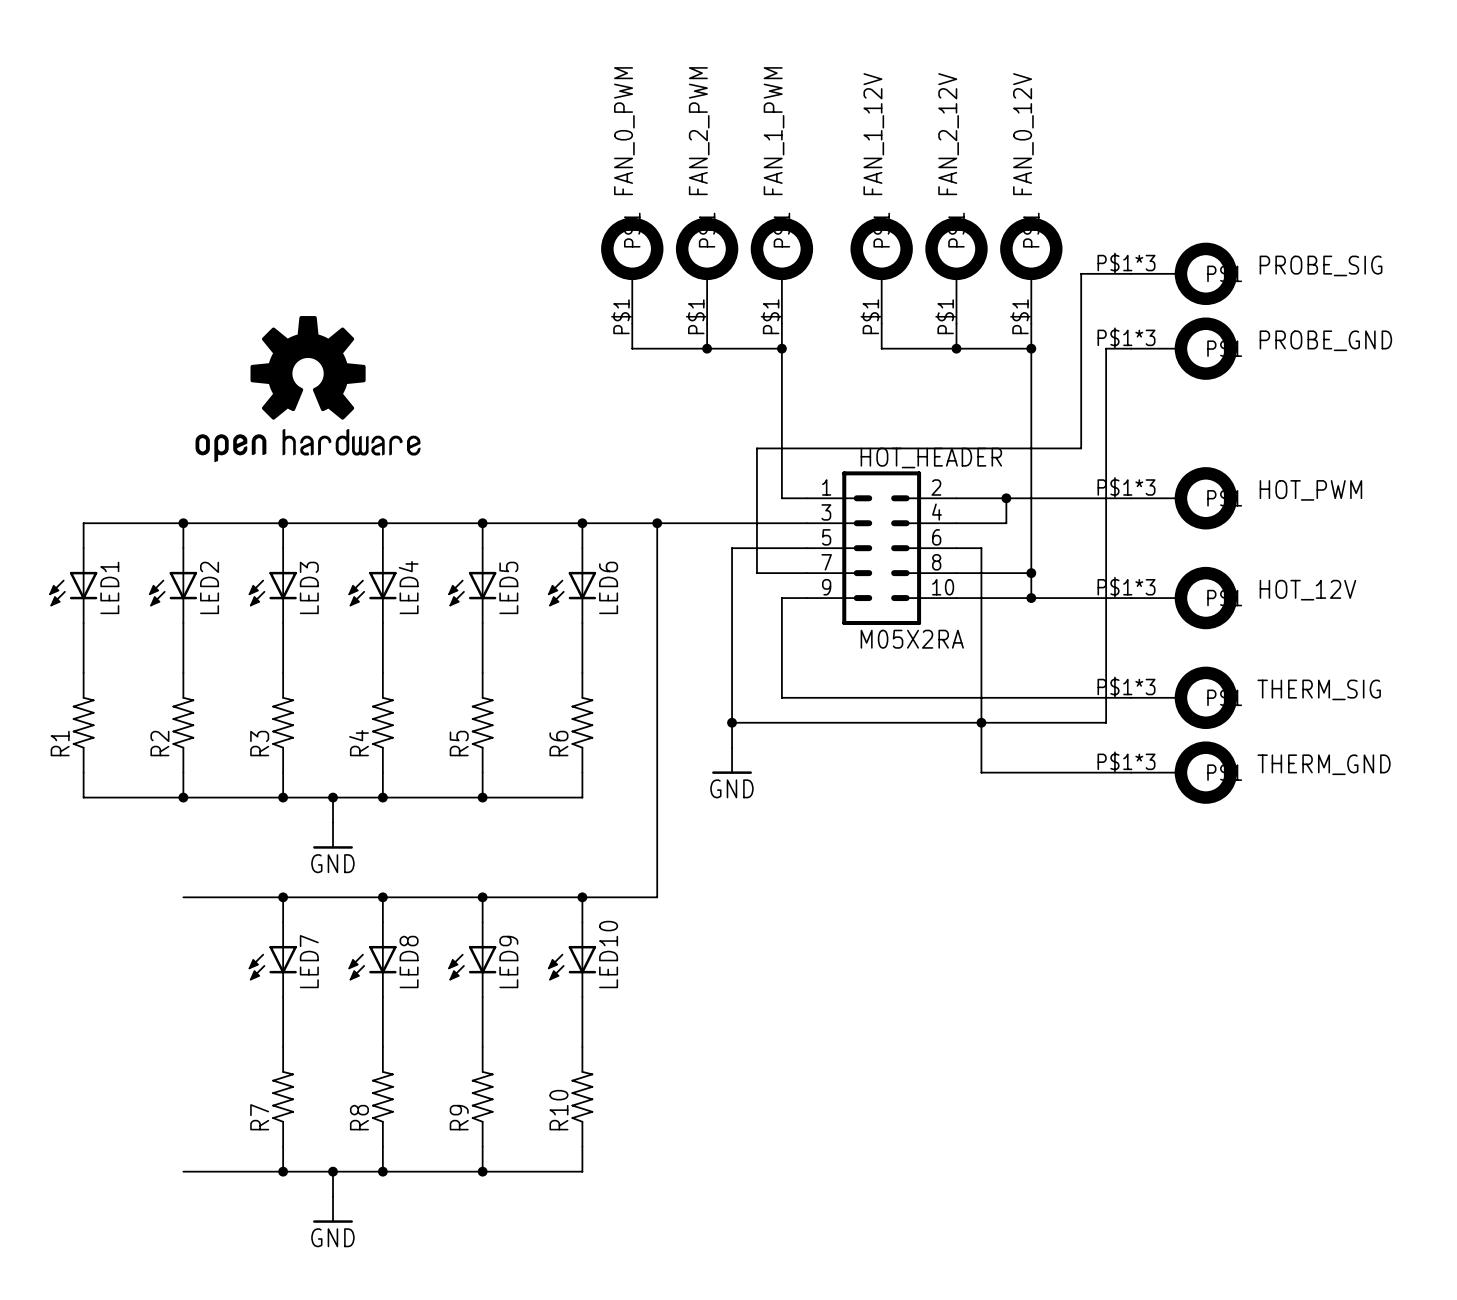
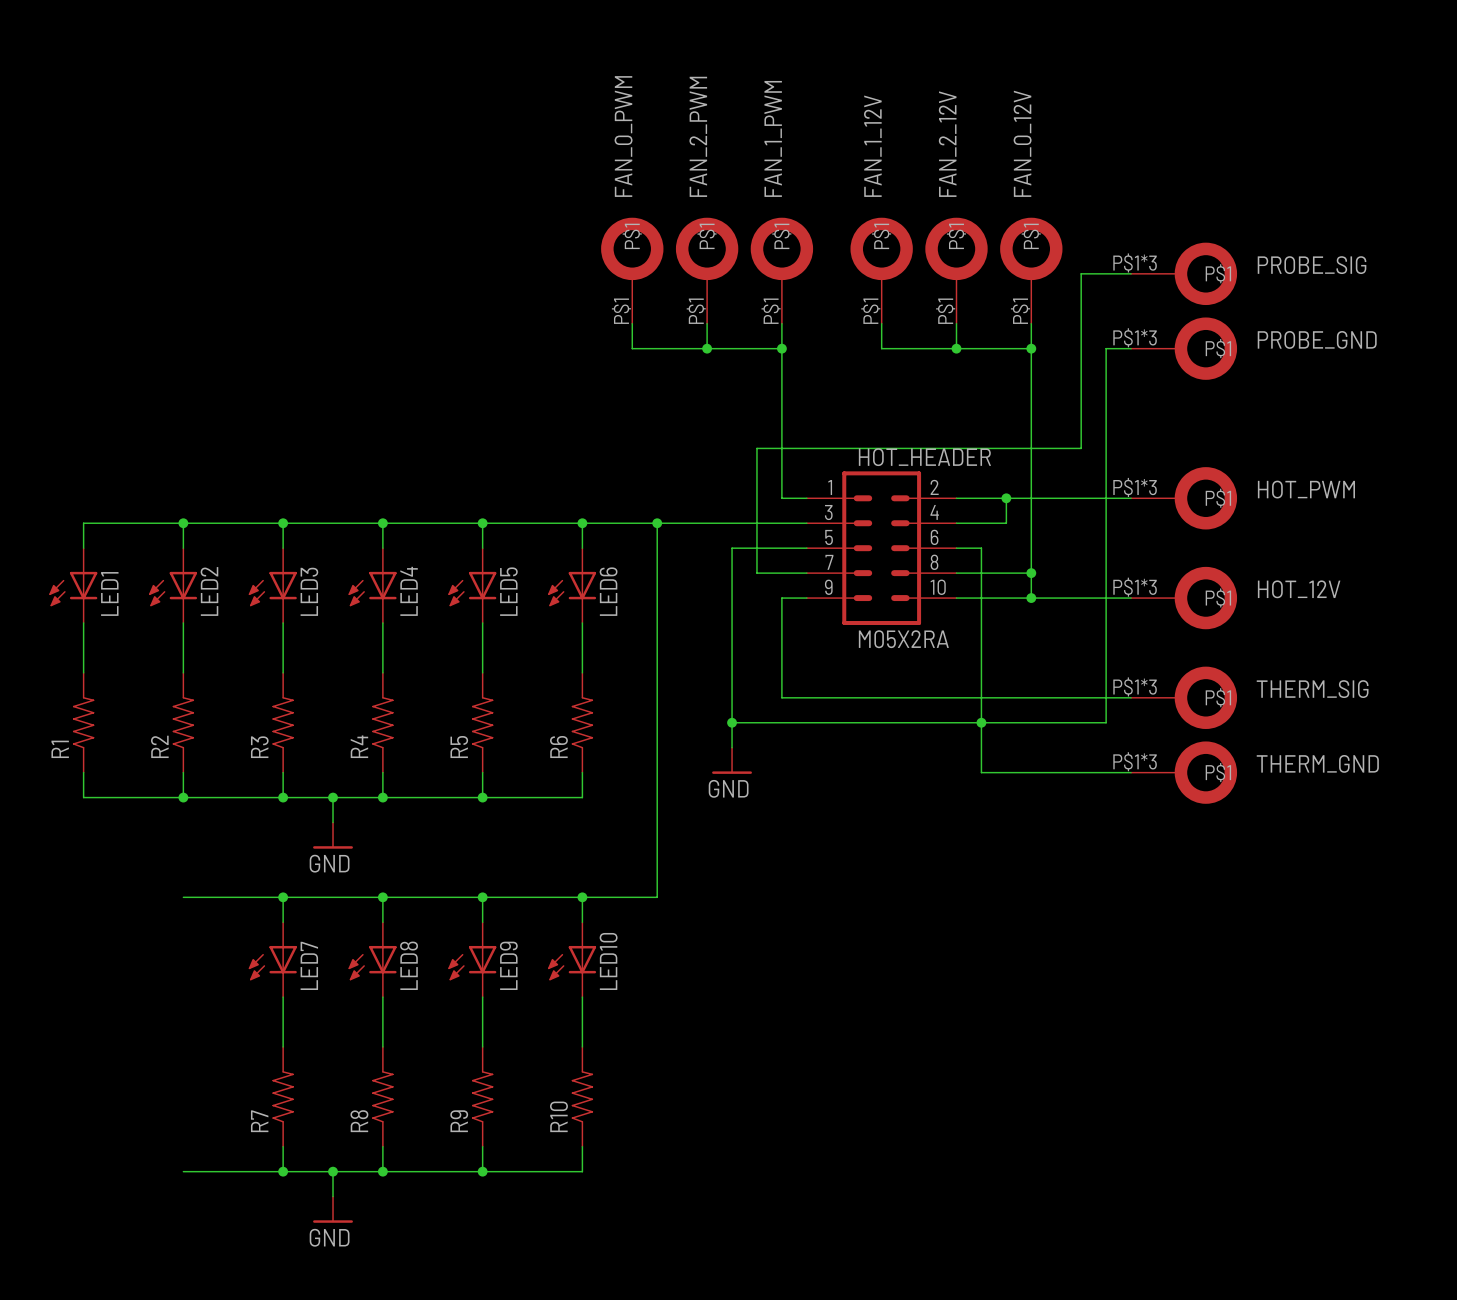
part: (308, 389) -> none

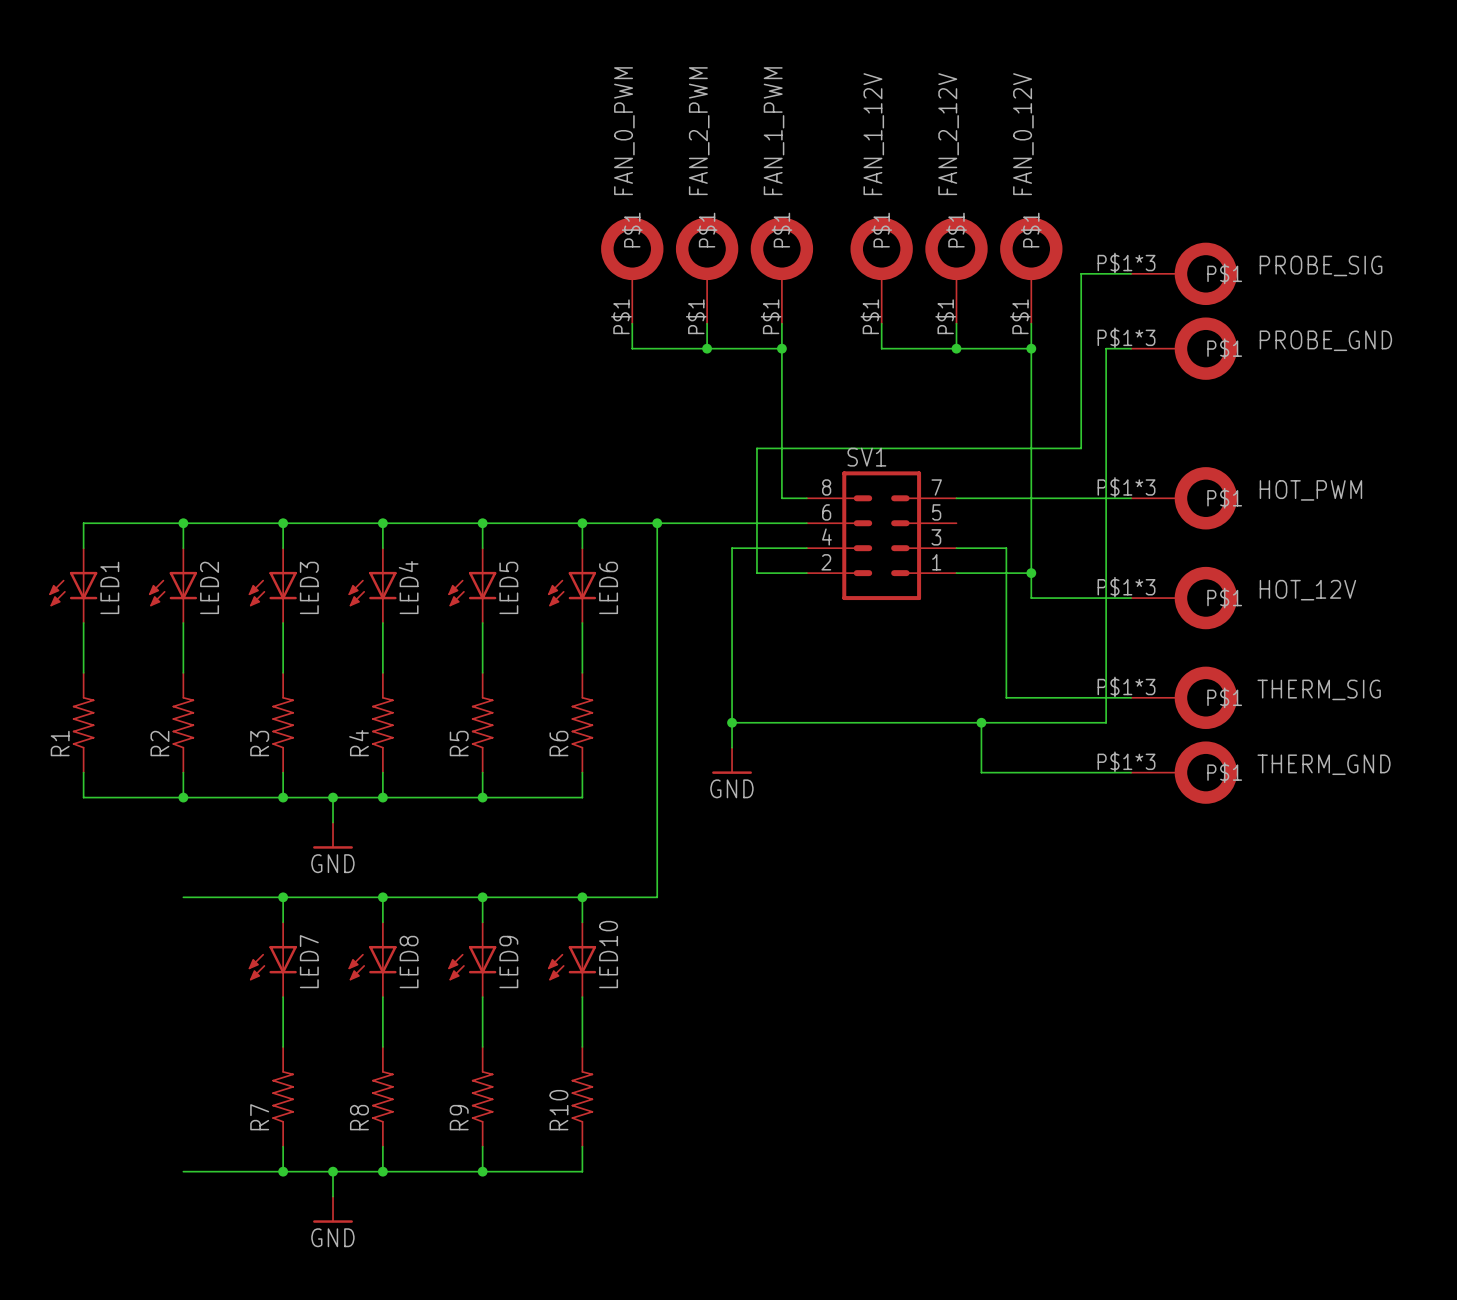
wire: (1006, 498) (1006, 523) (956, 523) -> none
junction: (1006, 498) -> none
SV1: none -> (881, 535)
HOT_HEADER: M05X2RA (881, 548) -> none
wire: (981, 548) (981, 722) -> (981, 548) (1006, 548) (1006, 697)
wire: (806, 598) (781, 598) (781, 697) (1006, 697) -> none
wire: (956, 598) (1031, 598) -> none
junction: (1031, 598) -> none

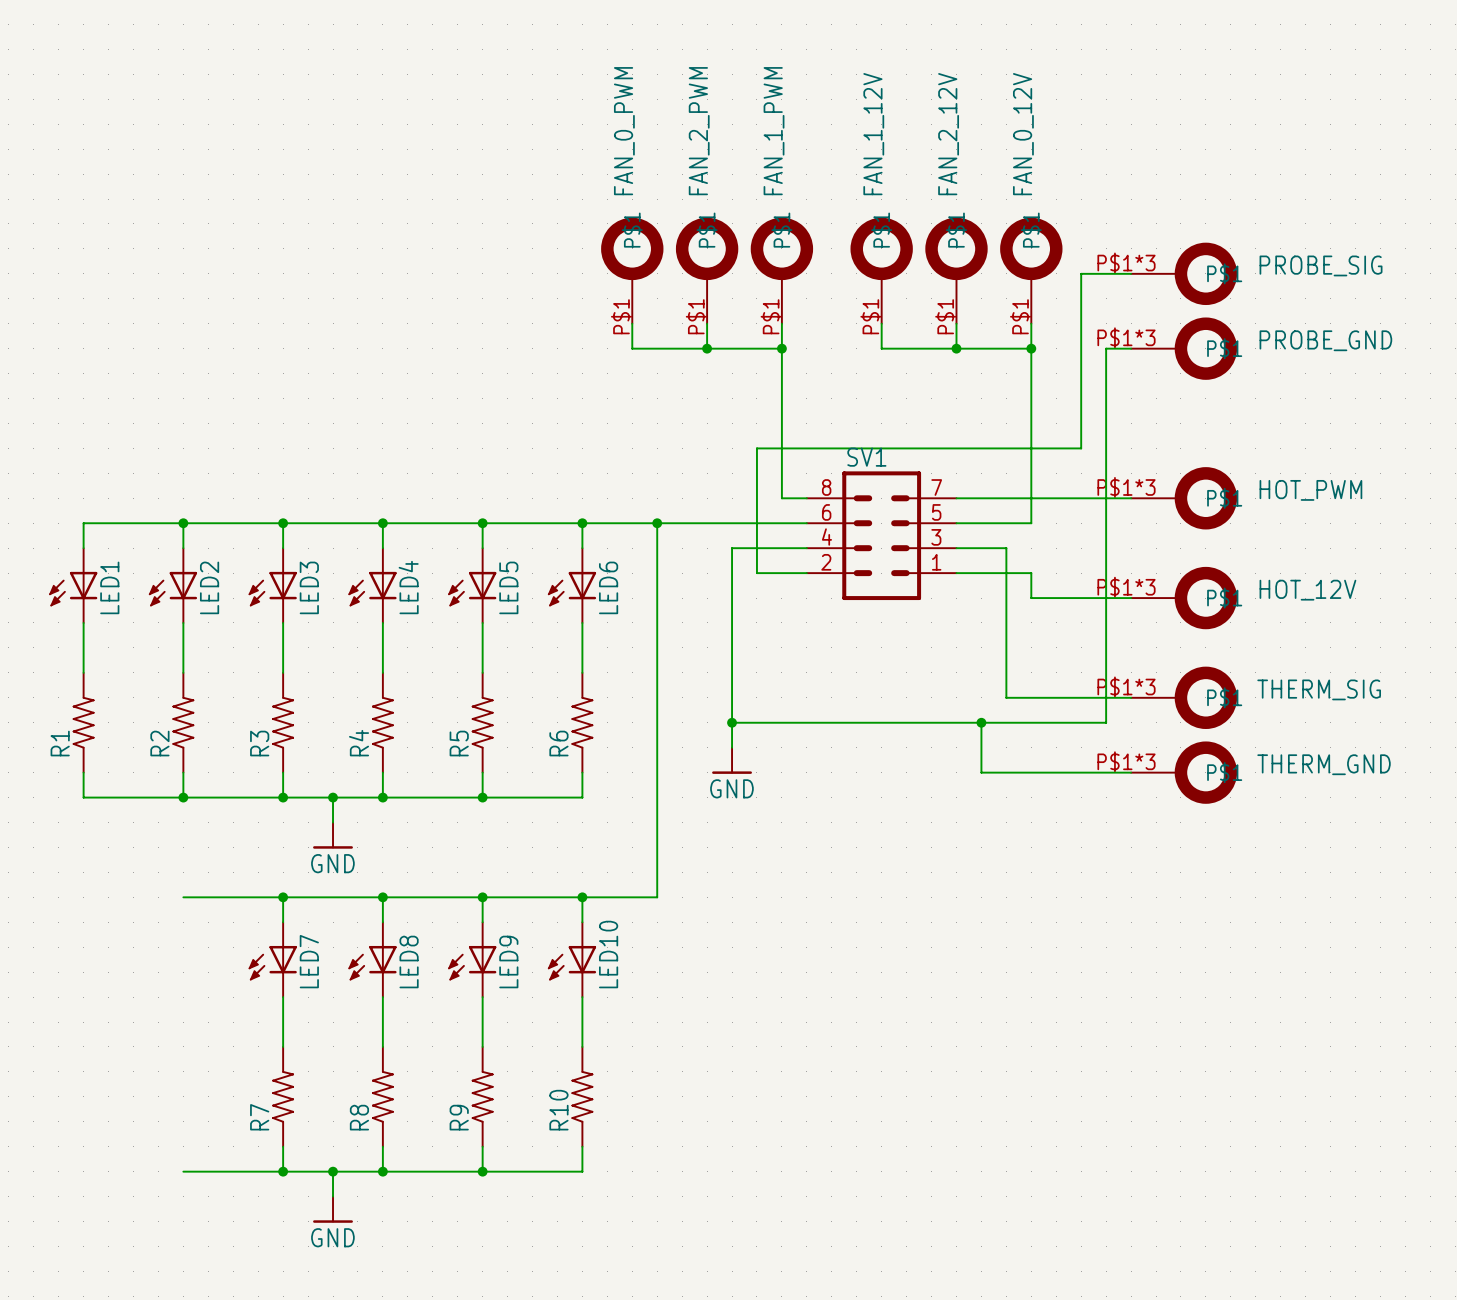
wire: (1031, 523) (1031, 573) -> (1031, 523) (956, 523)
junction: (1031, 573) -> none

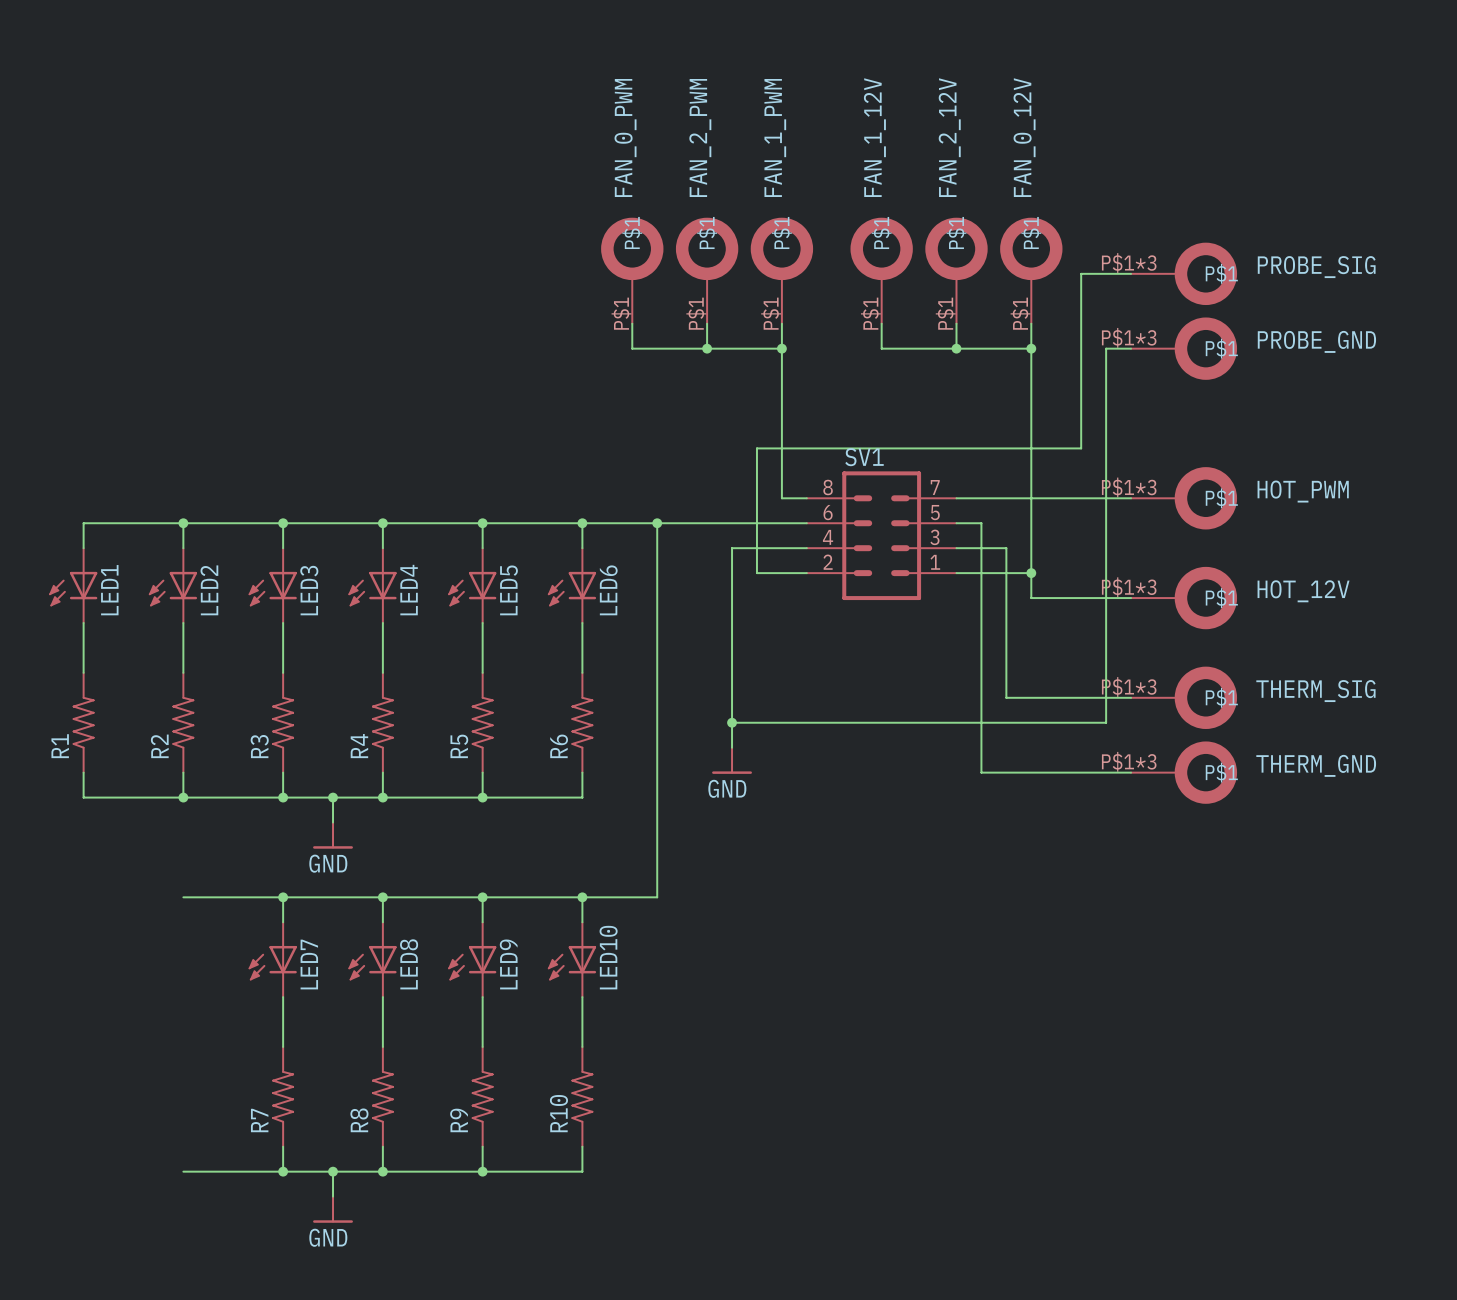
wire: (981, 523) (1031, 523) -> (1031, 573) (1031, 523)
wire: none -> (981, 523) (981, 722)
junction: none -> (1031, 573)
junction: (981, 722) -> none

